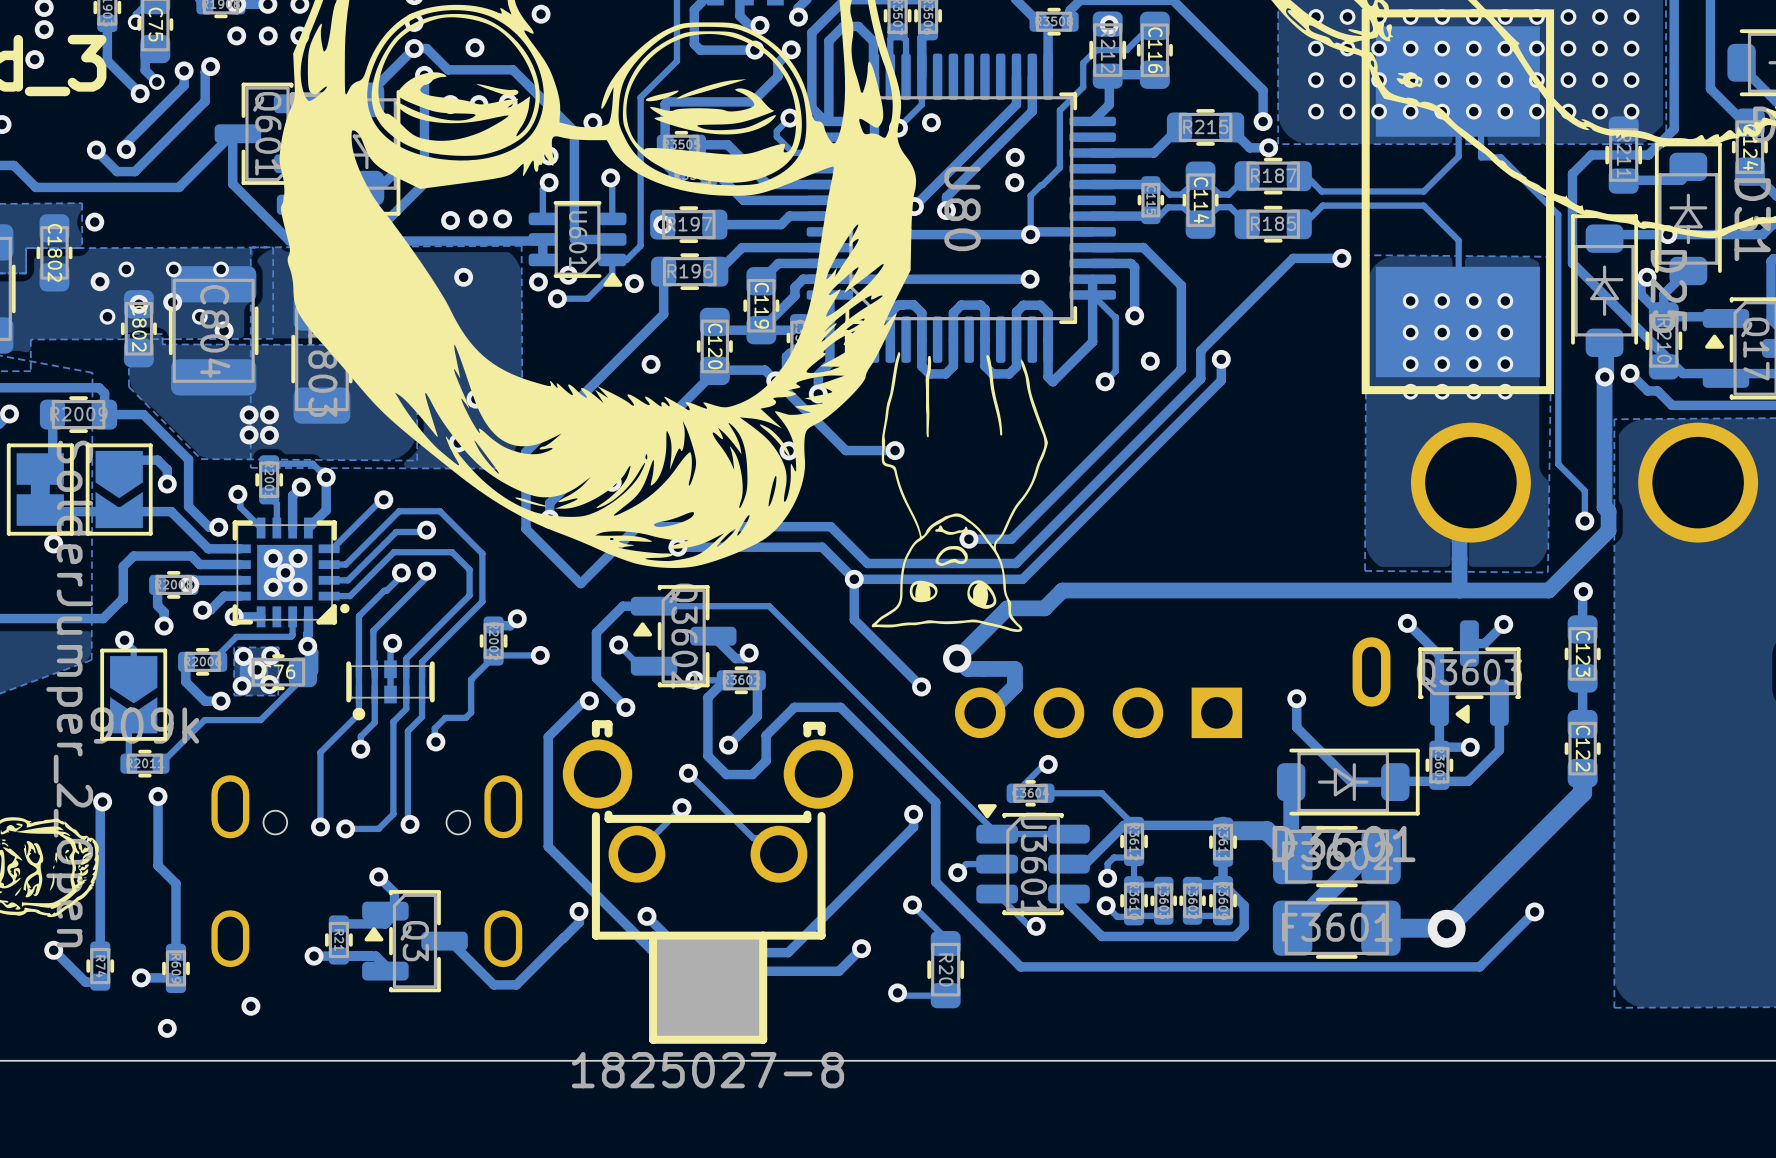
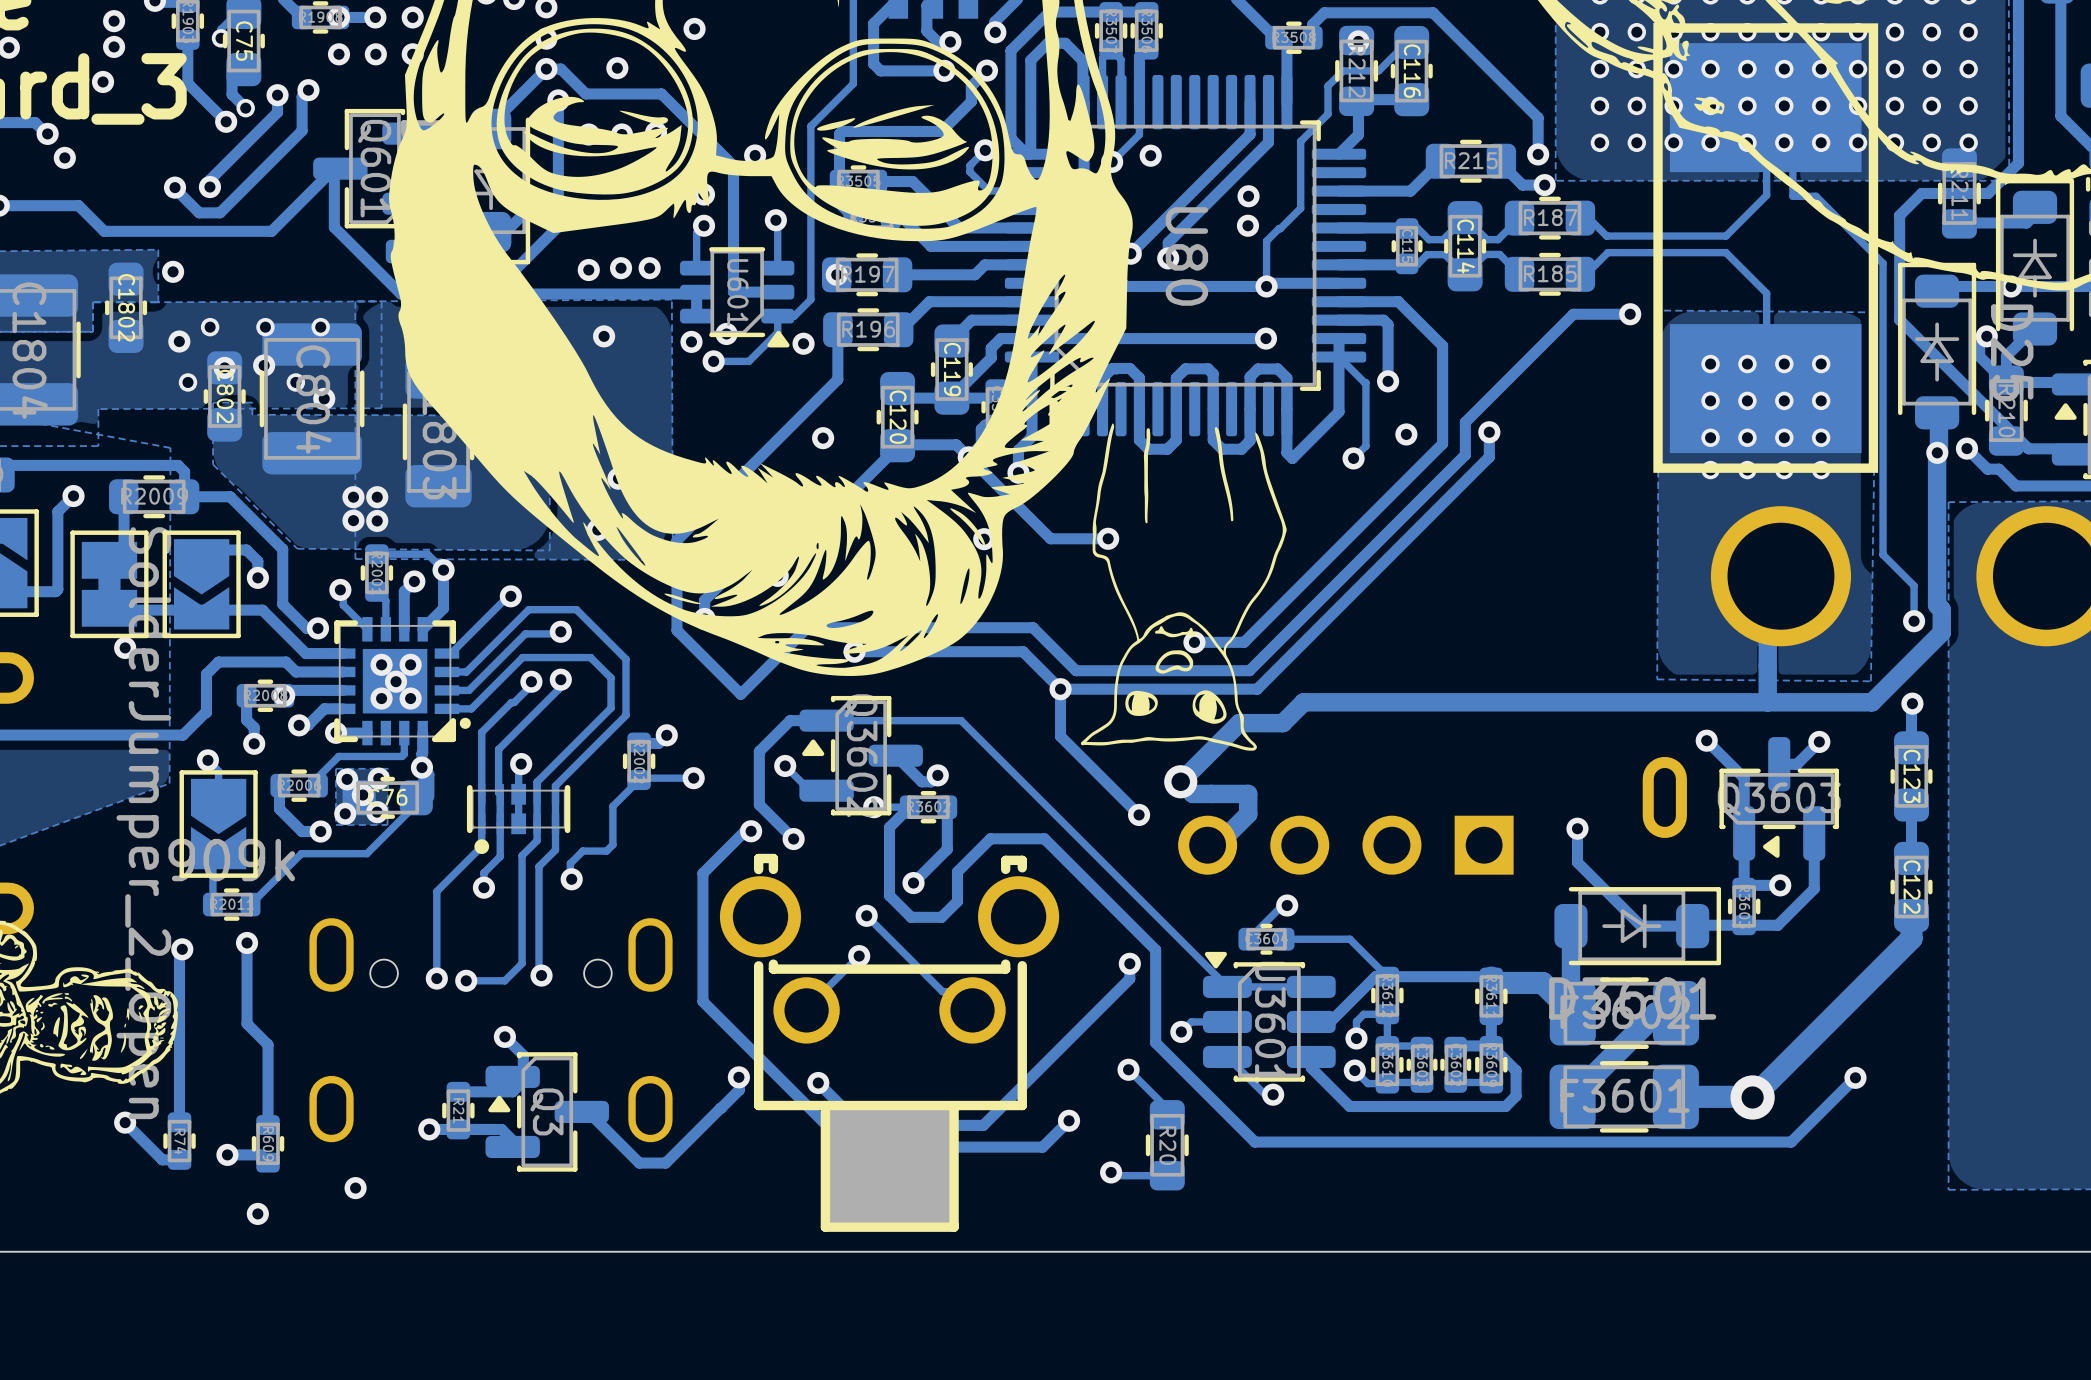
part value: 1825027-8 (707, 1070) -> none

